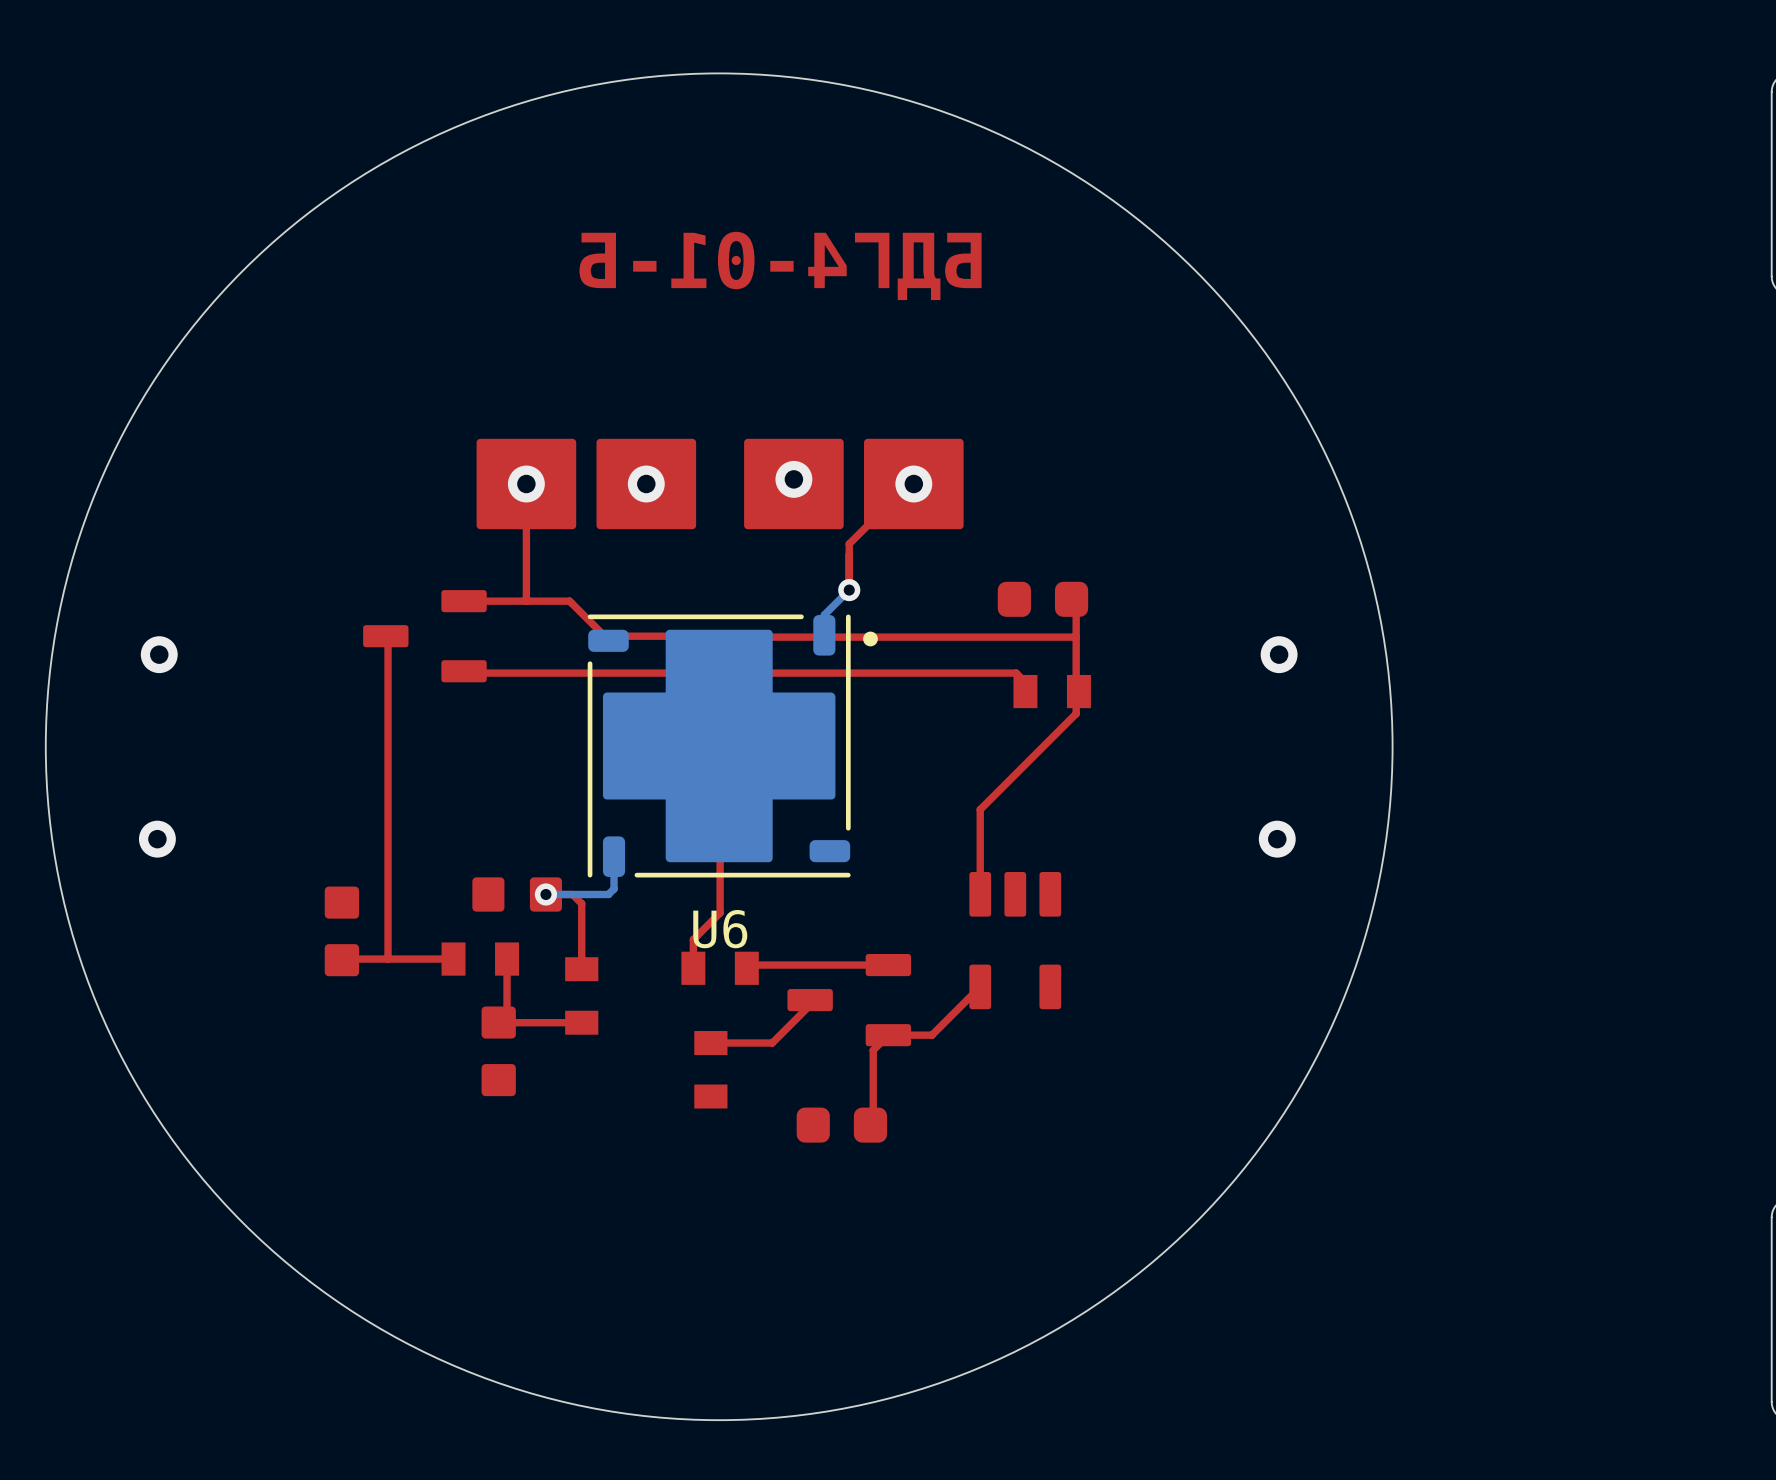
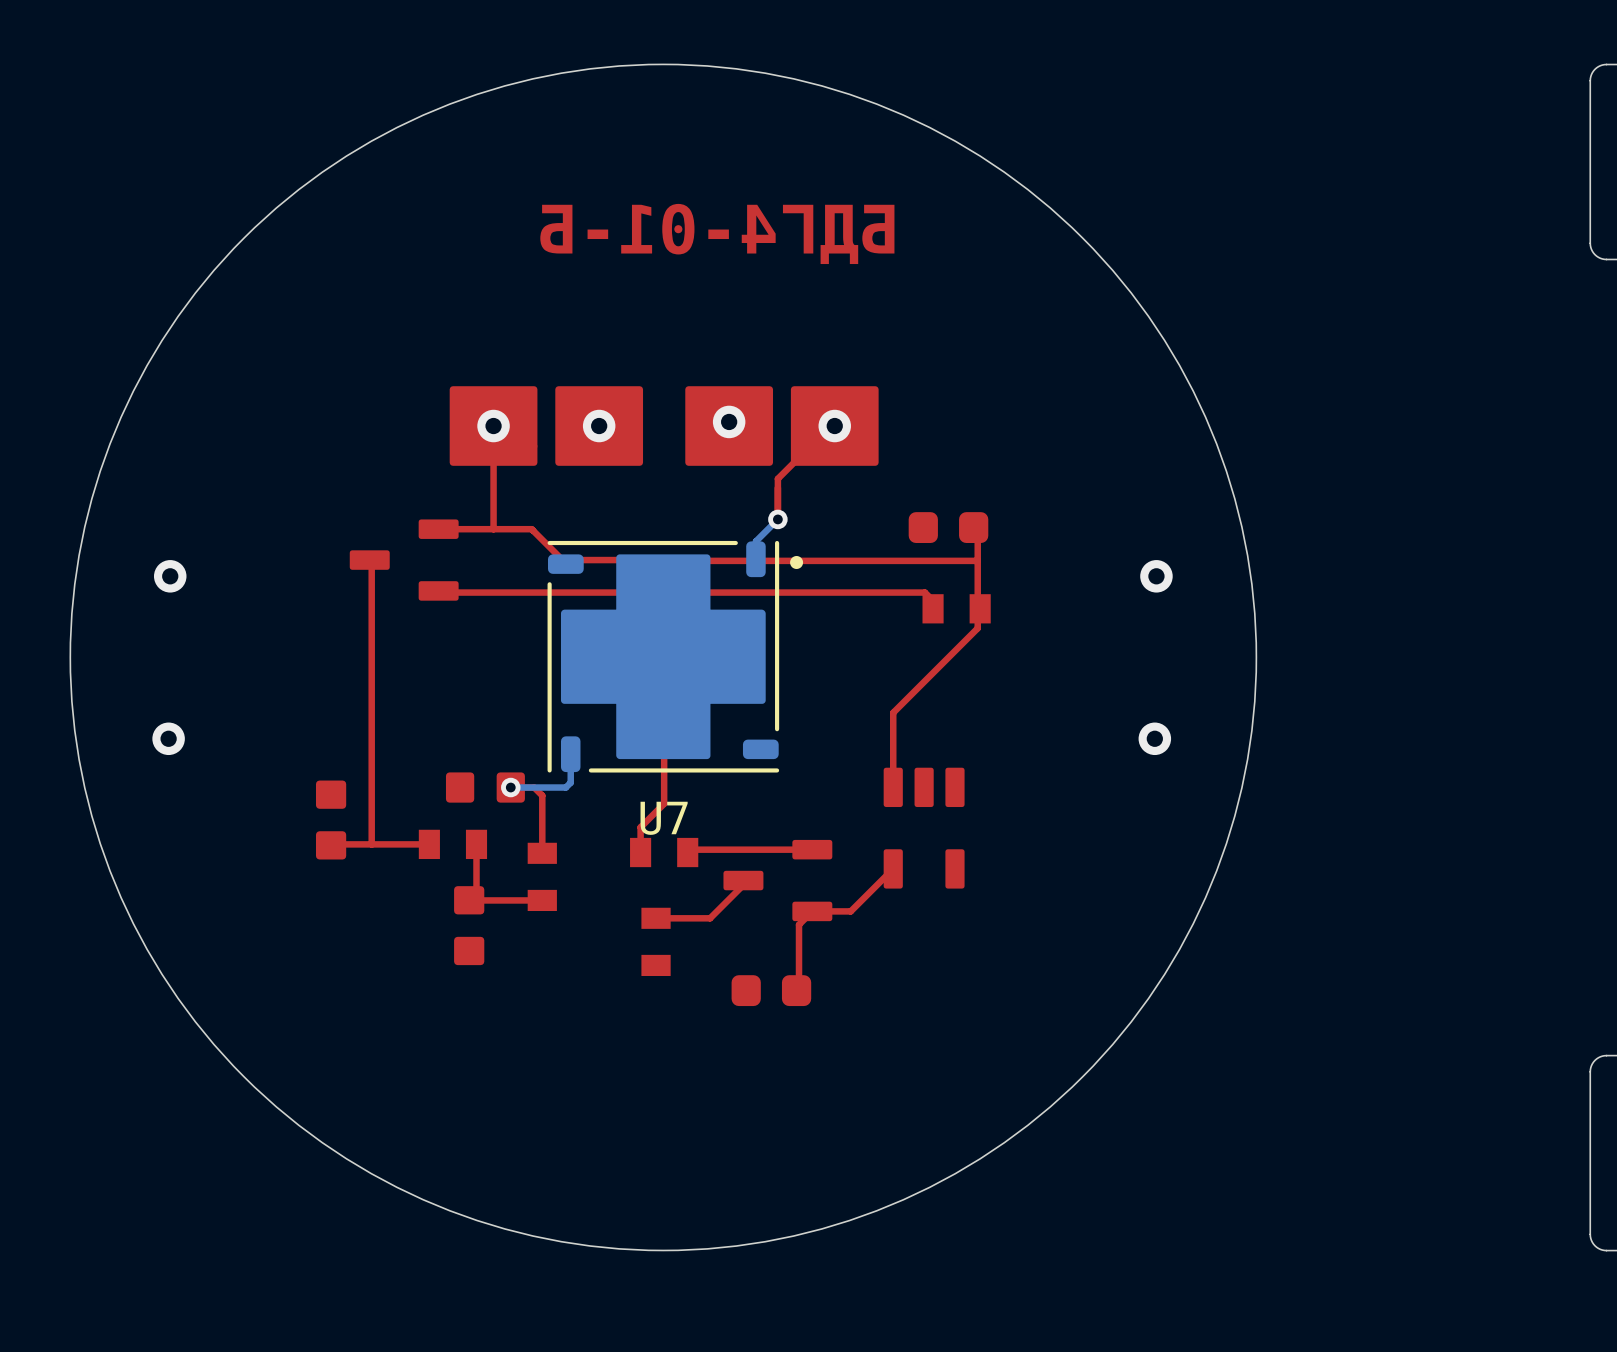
U6 name: U6 (720, 929) -> U7 (664, 818)

